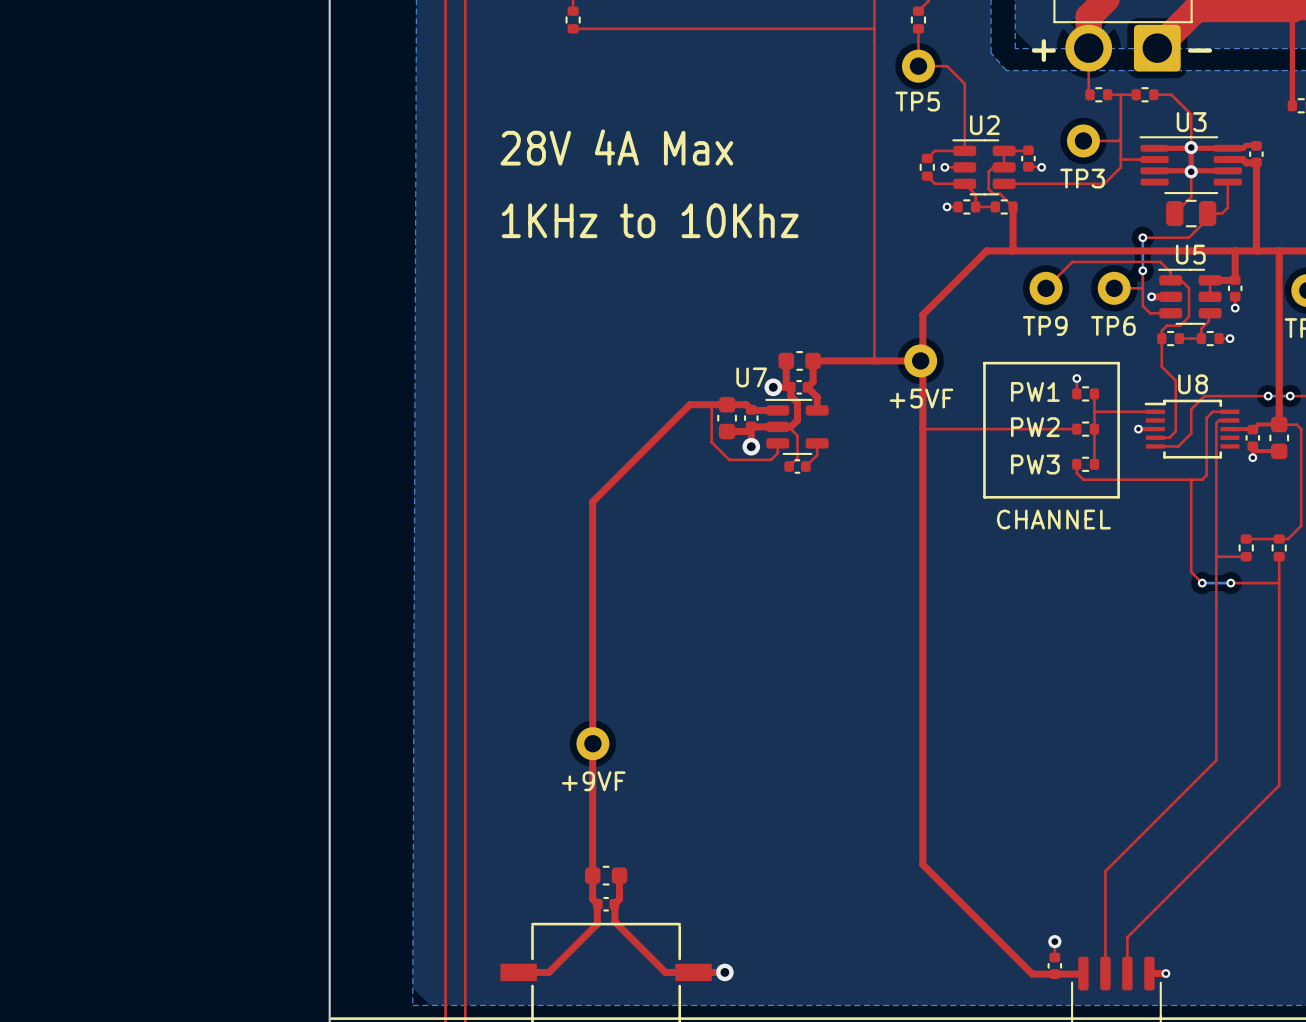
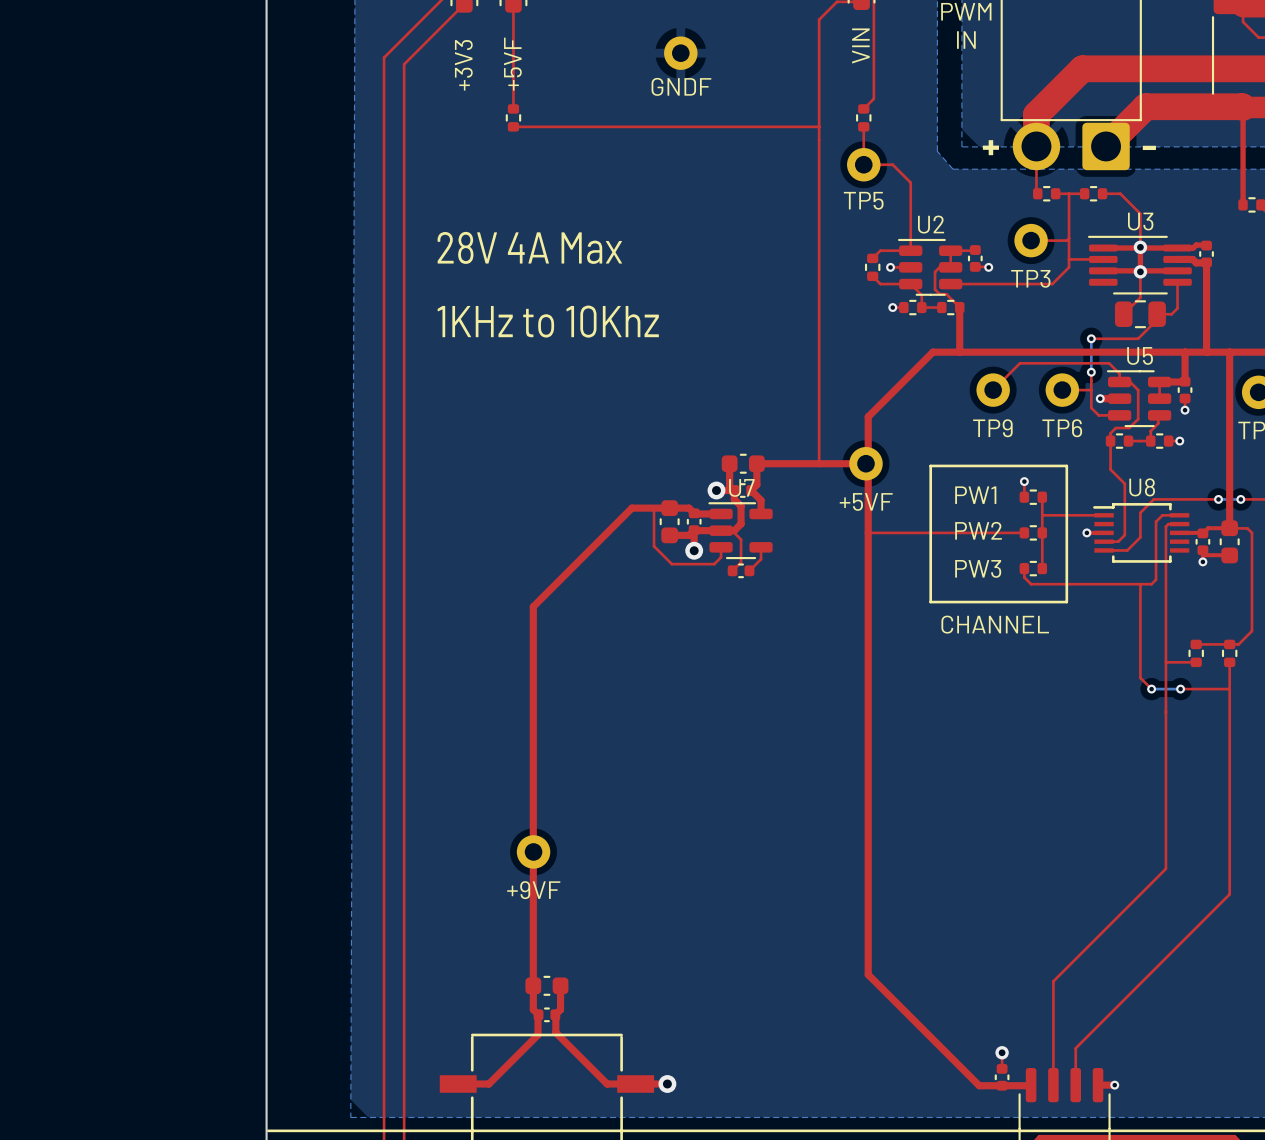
U7 name position: U7 (751, 377) -> U7 (741, 487)

